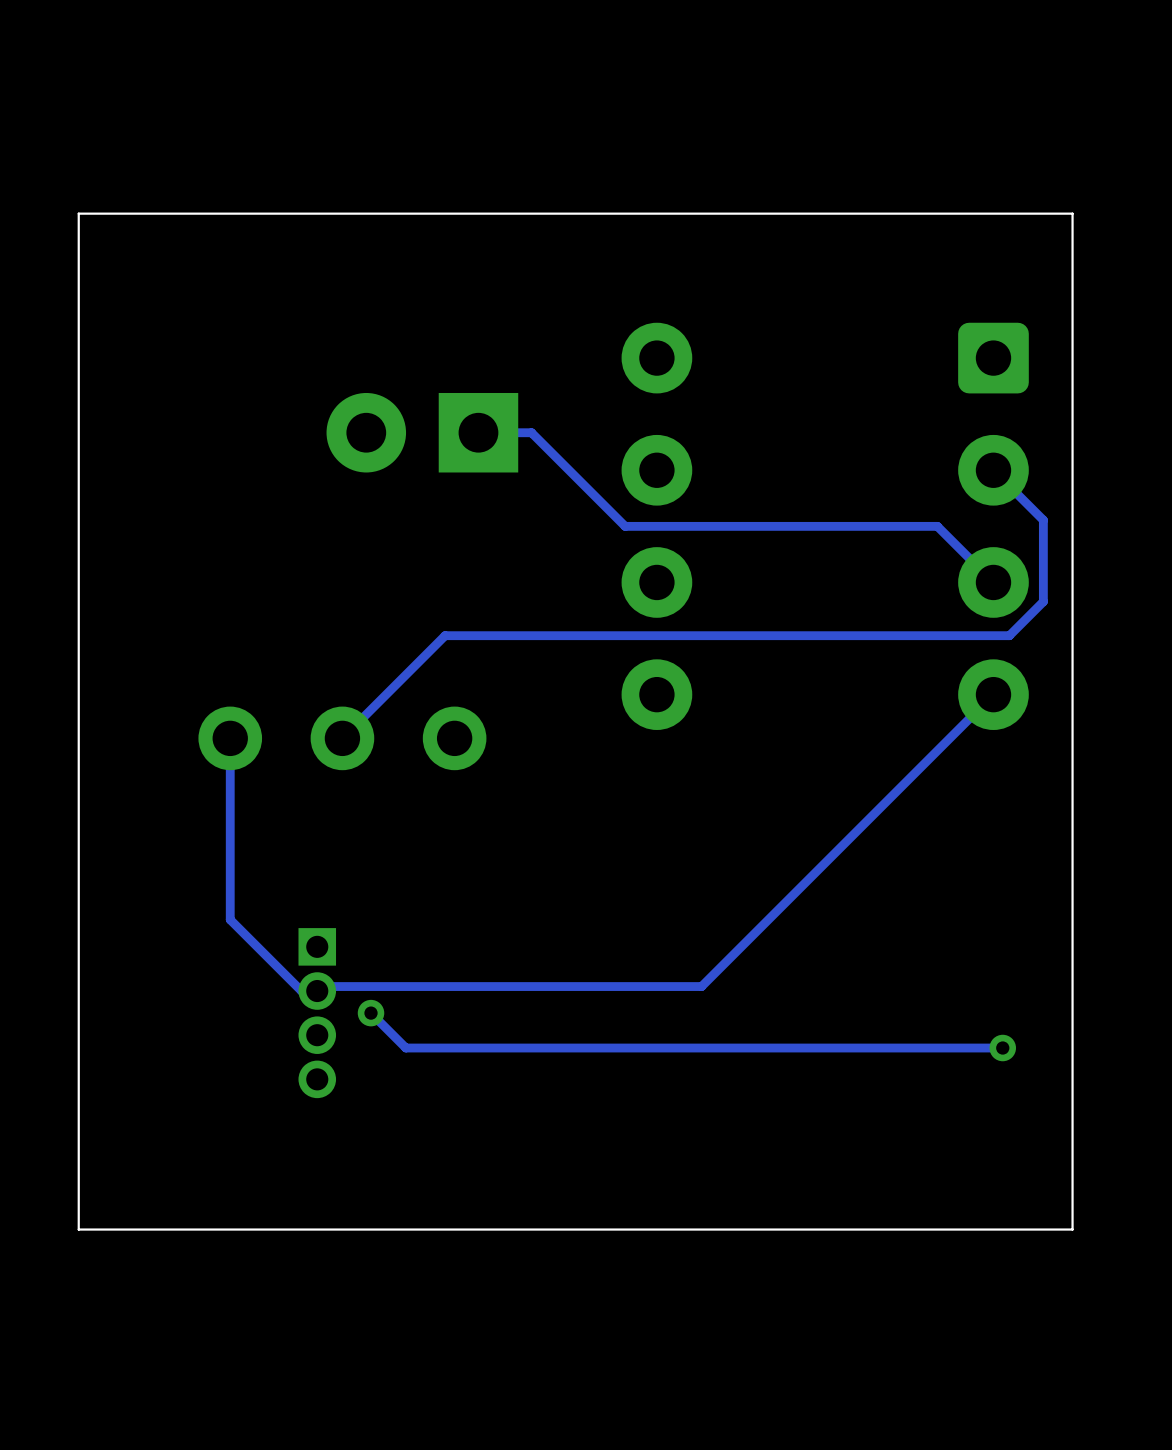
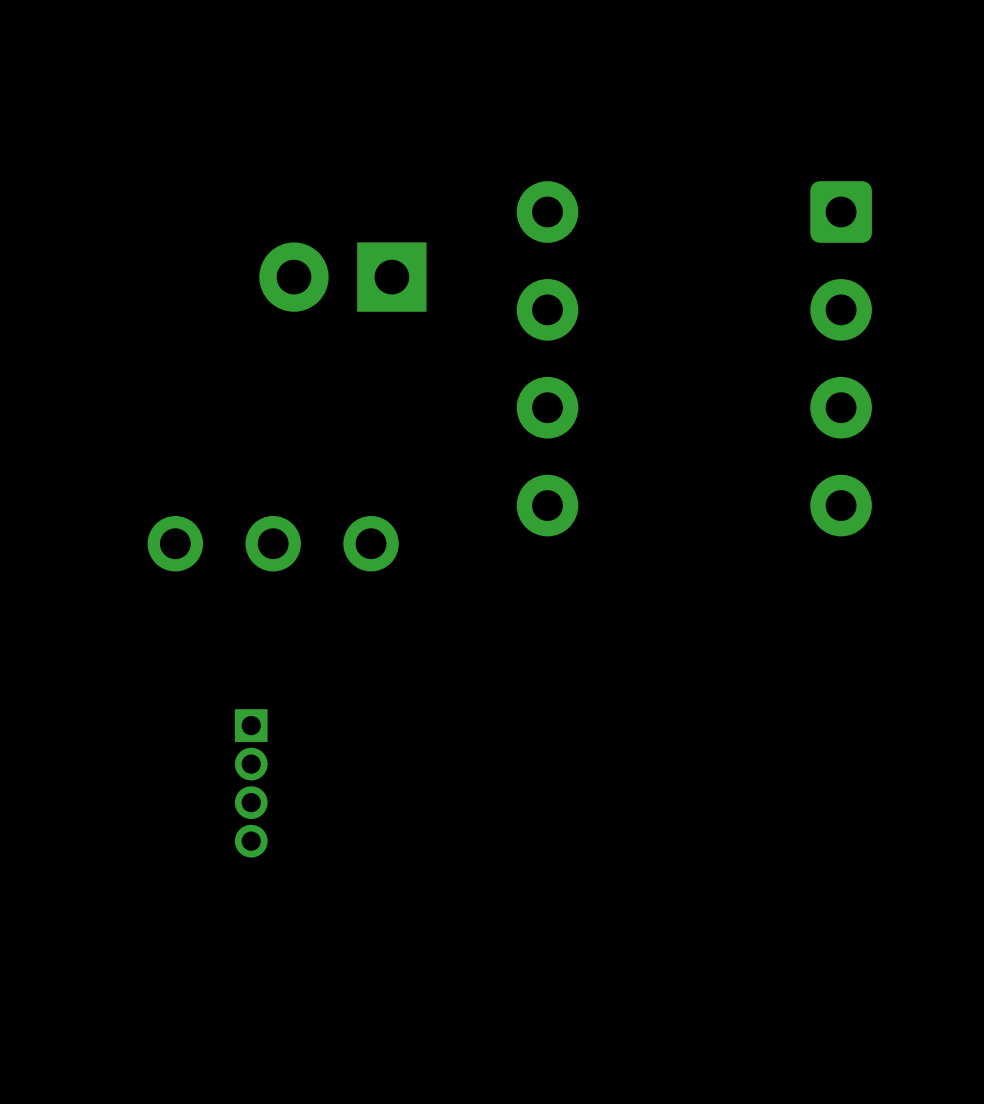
board edge: (1072, 213) (78, 213) (78, 1229) (1072, 1229) (1072, 213) -> none
track: (478, 432) (531, 432) (625, 526) (937, 526) (993, 582) -> none
track: (993, 470) (1043, 520) (1043, 601) (1009, 635) (445, 635) (342, 738) -> none
track: (993, 694) (701, 986) (321, 986) (317, 991) (301, 991) (230, 919) (230, 738) -> none
track: (371, 1013) (405, 1048) (1002, 1048) -> none
via: (371, 1013) -> none
via: (1002, 1048) -> none

